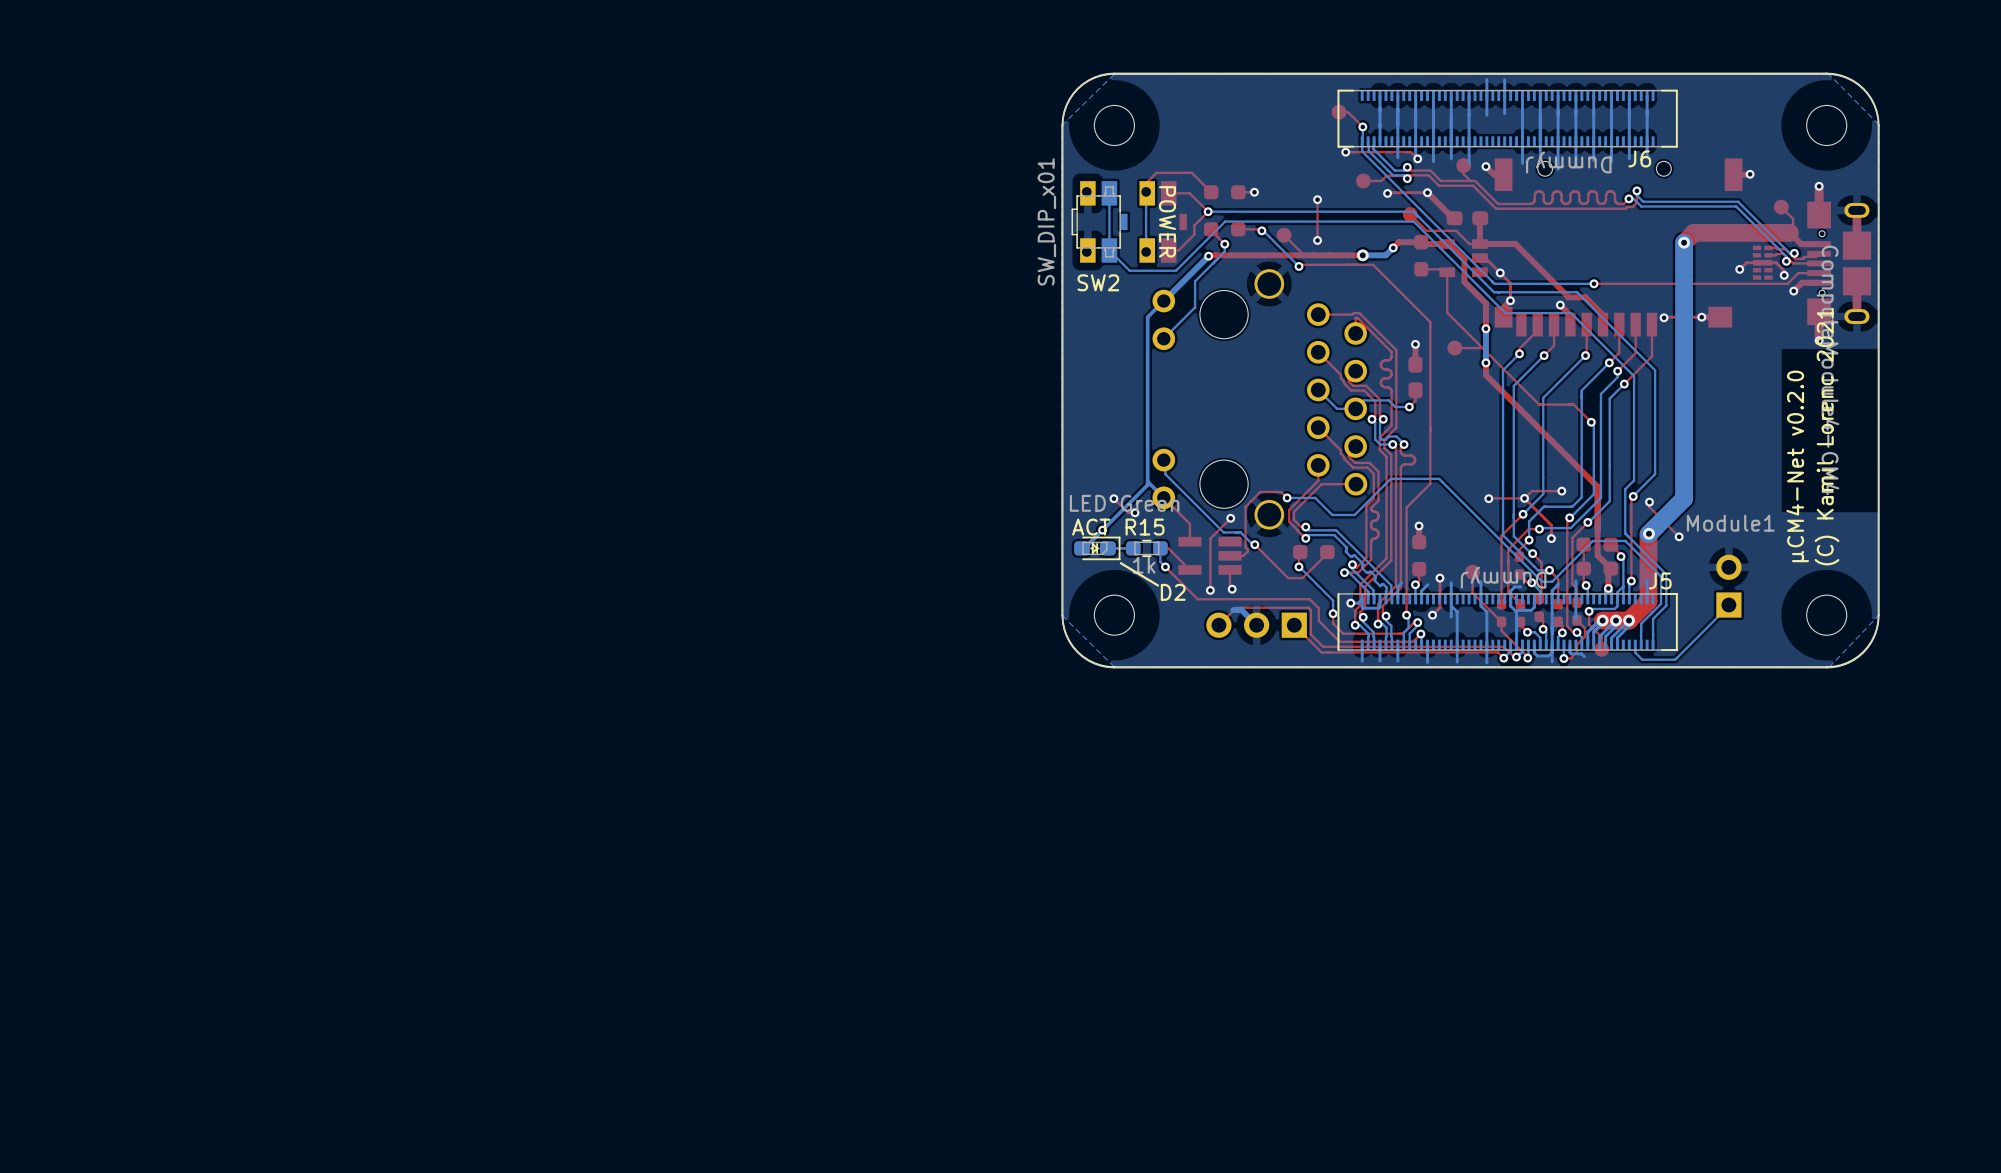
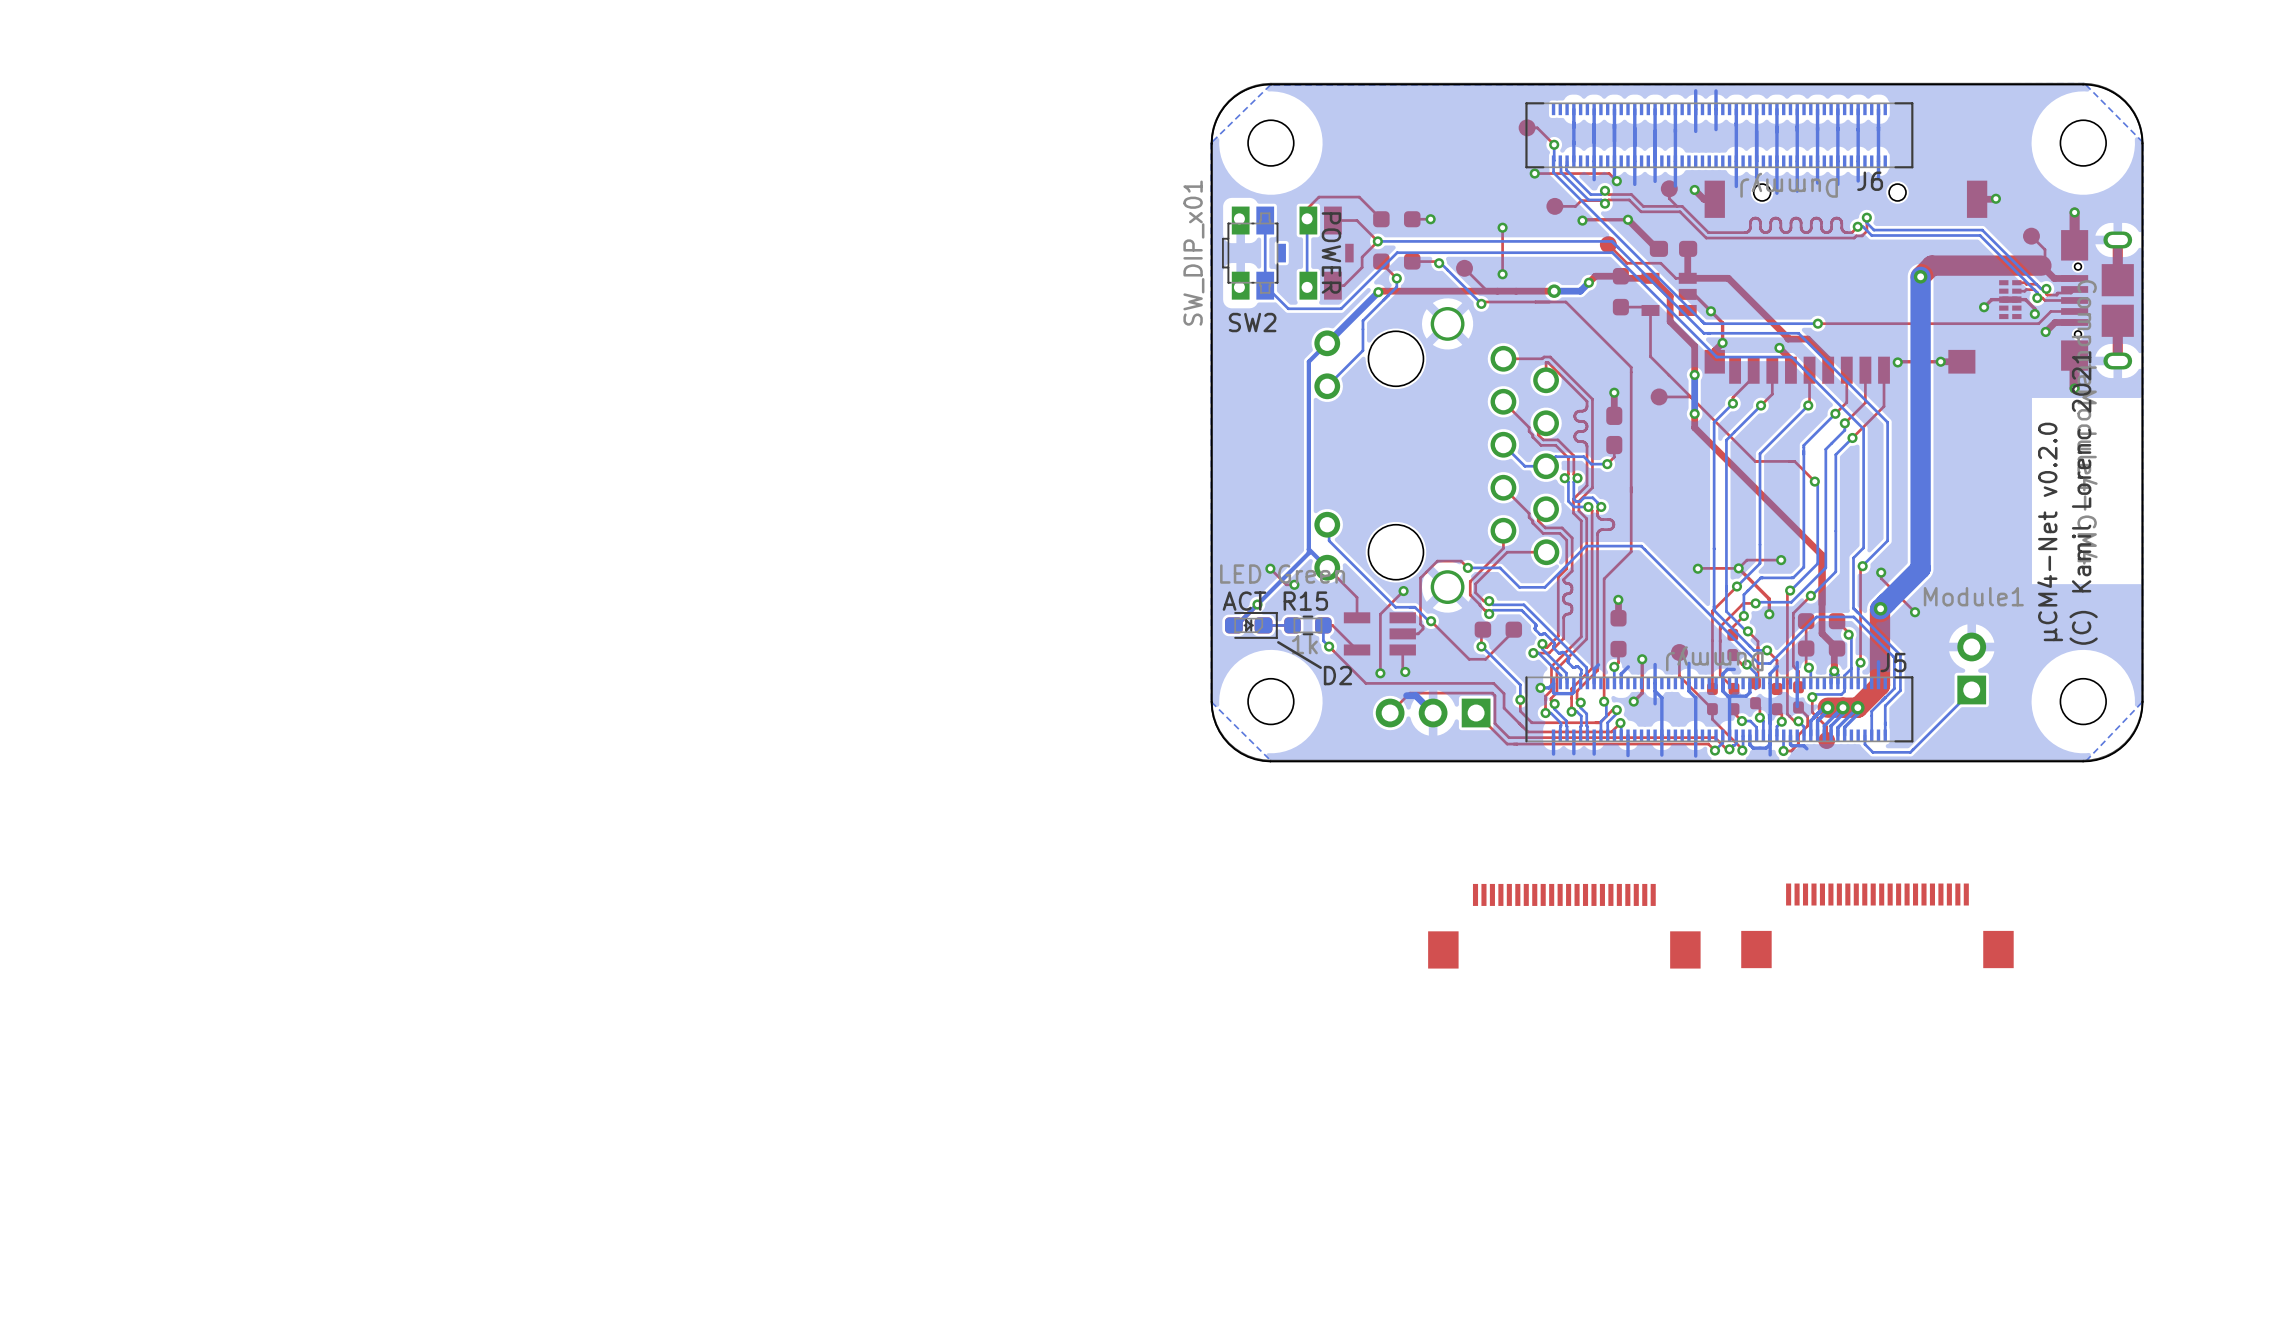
part: none -> (1877, 925)
part: none -> (1564, 926)

